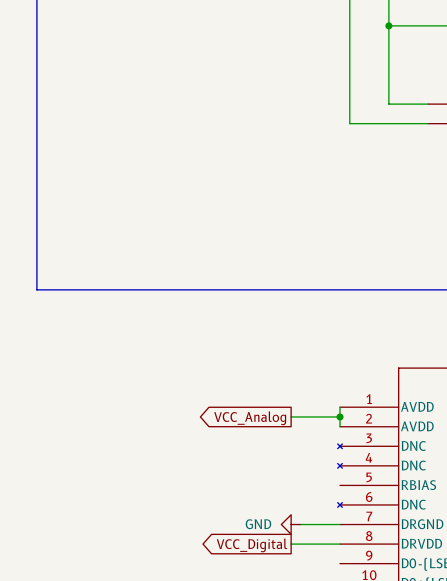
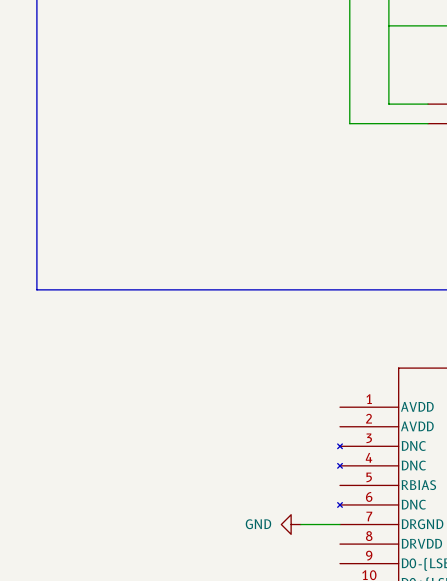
junction: (388, 25) -> none
wire: (340, 407) (340, 426) -> none
wire: (291, 416) (340, 416) -> none
junction: (340, 416) -> none
global label: VCC_Analog (250, 418) -> none
wire: (291, 544) (340, 544) -> none
global label: VCC_Digital (252, 545) -> none

